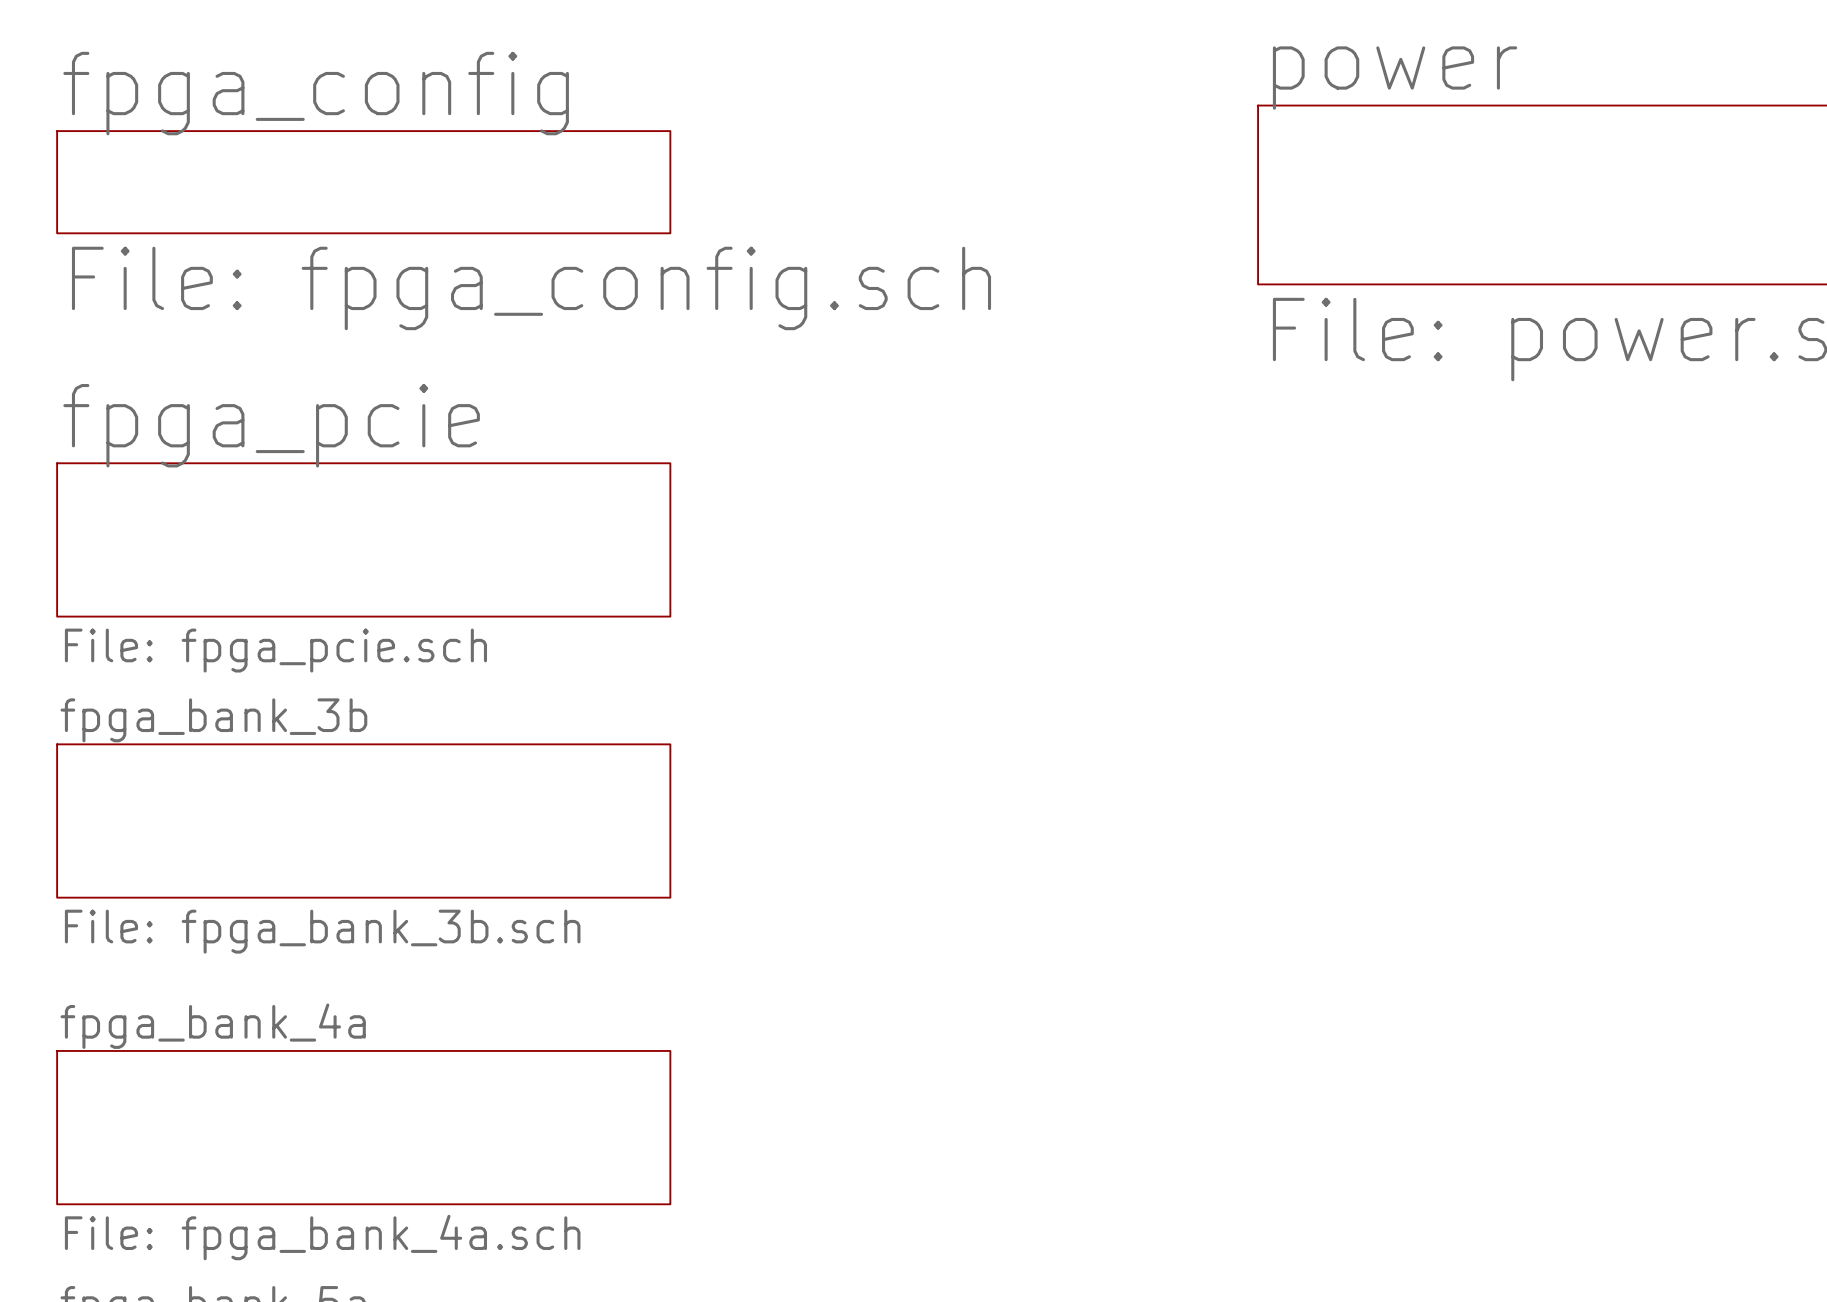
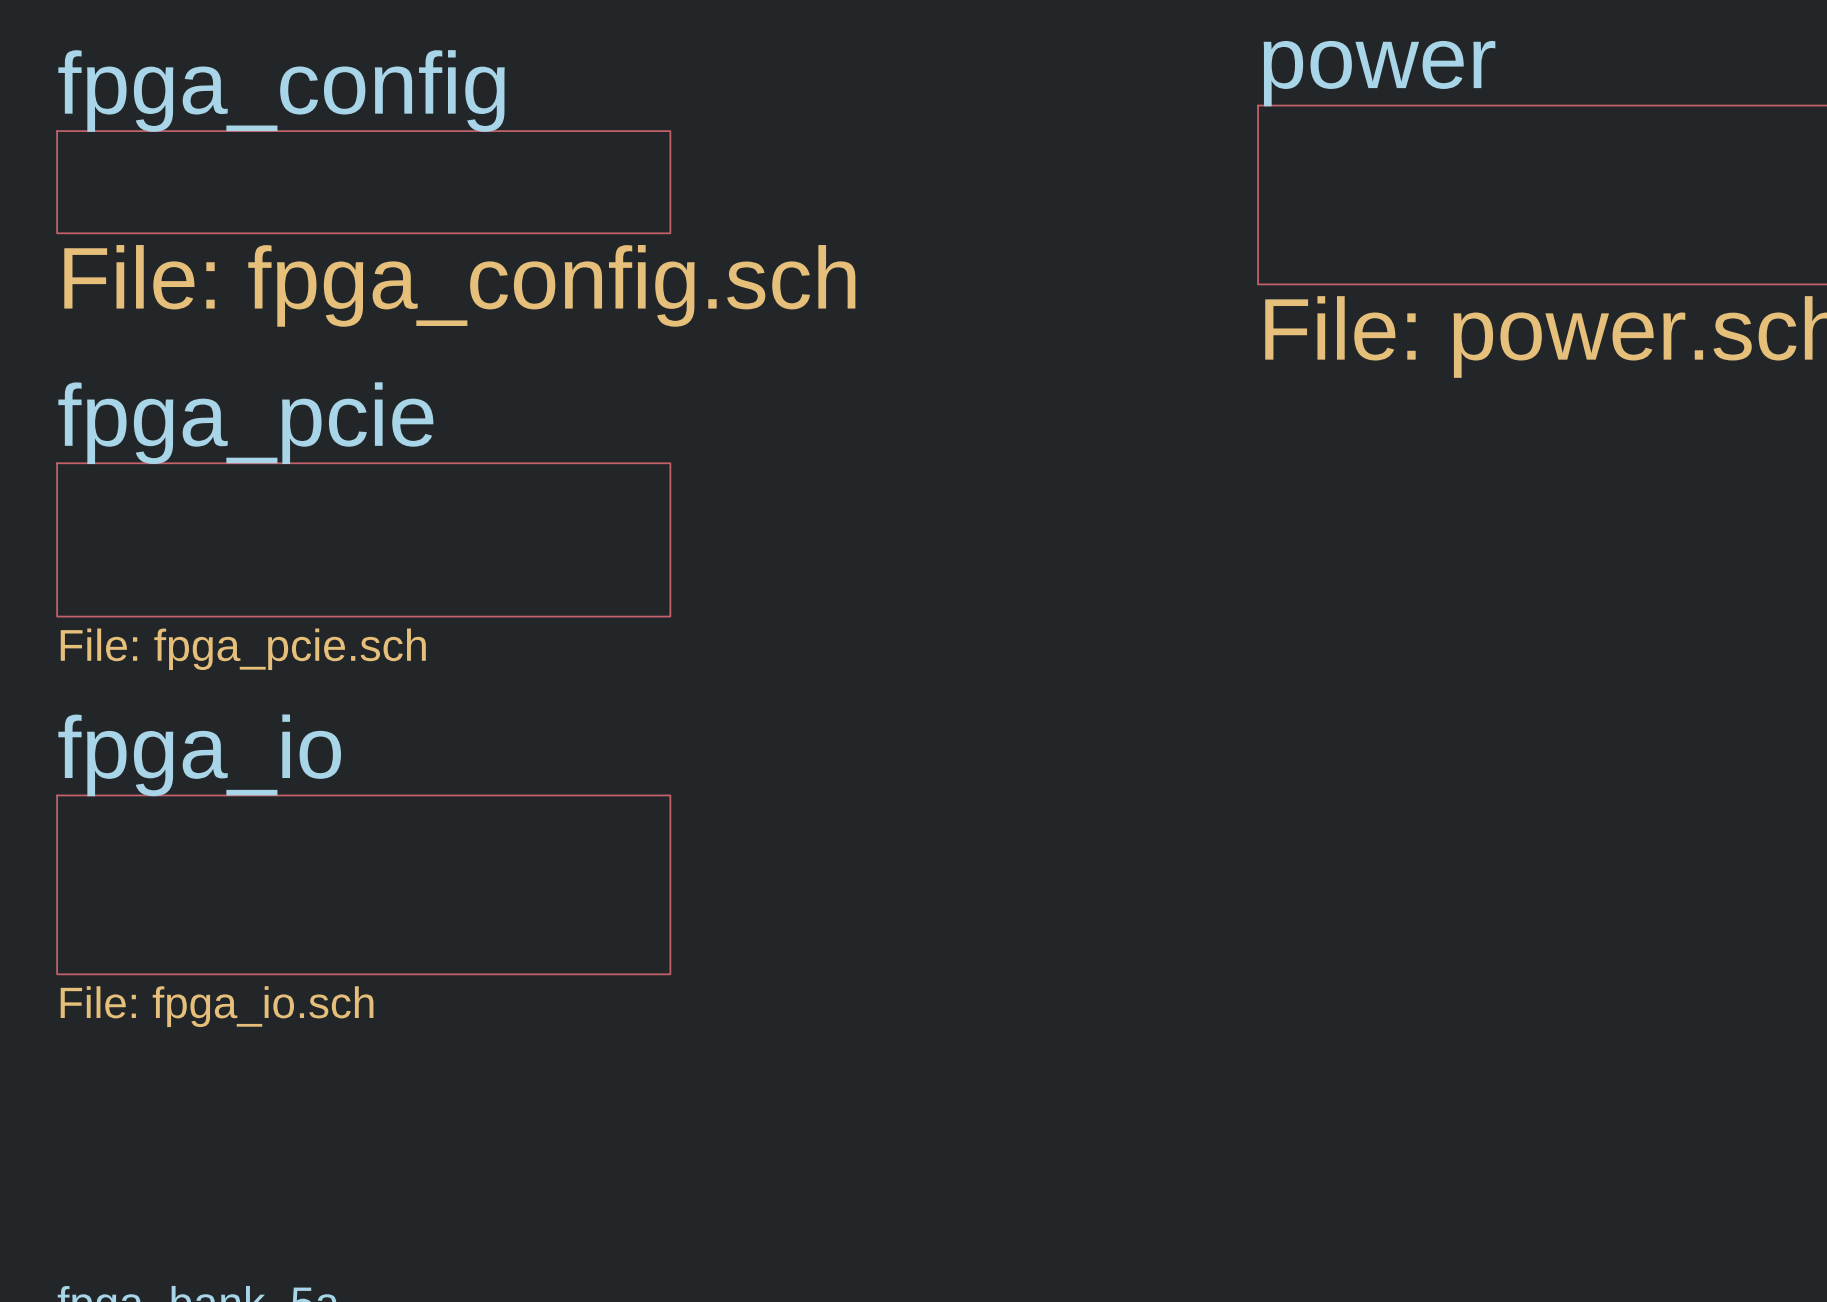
sheet fpga_bank_3b: File: fpga_bank_3b.sch (363, 821) -> none
sheet fpga_io: none -> File: fpga_io.sch (363, 884)
sheet fpga_bank_4a: File: fpga_bank_4a.sch (363, 1127) -> none

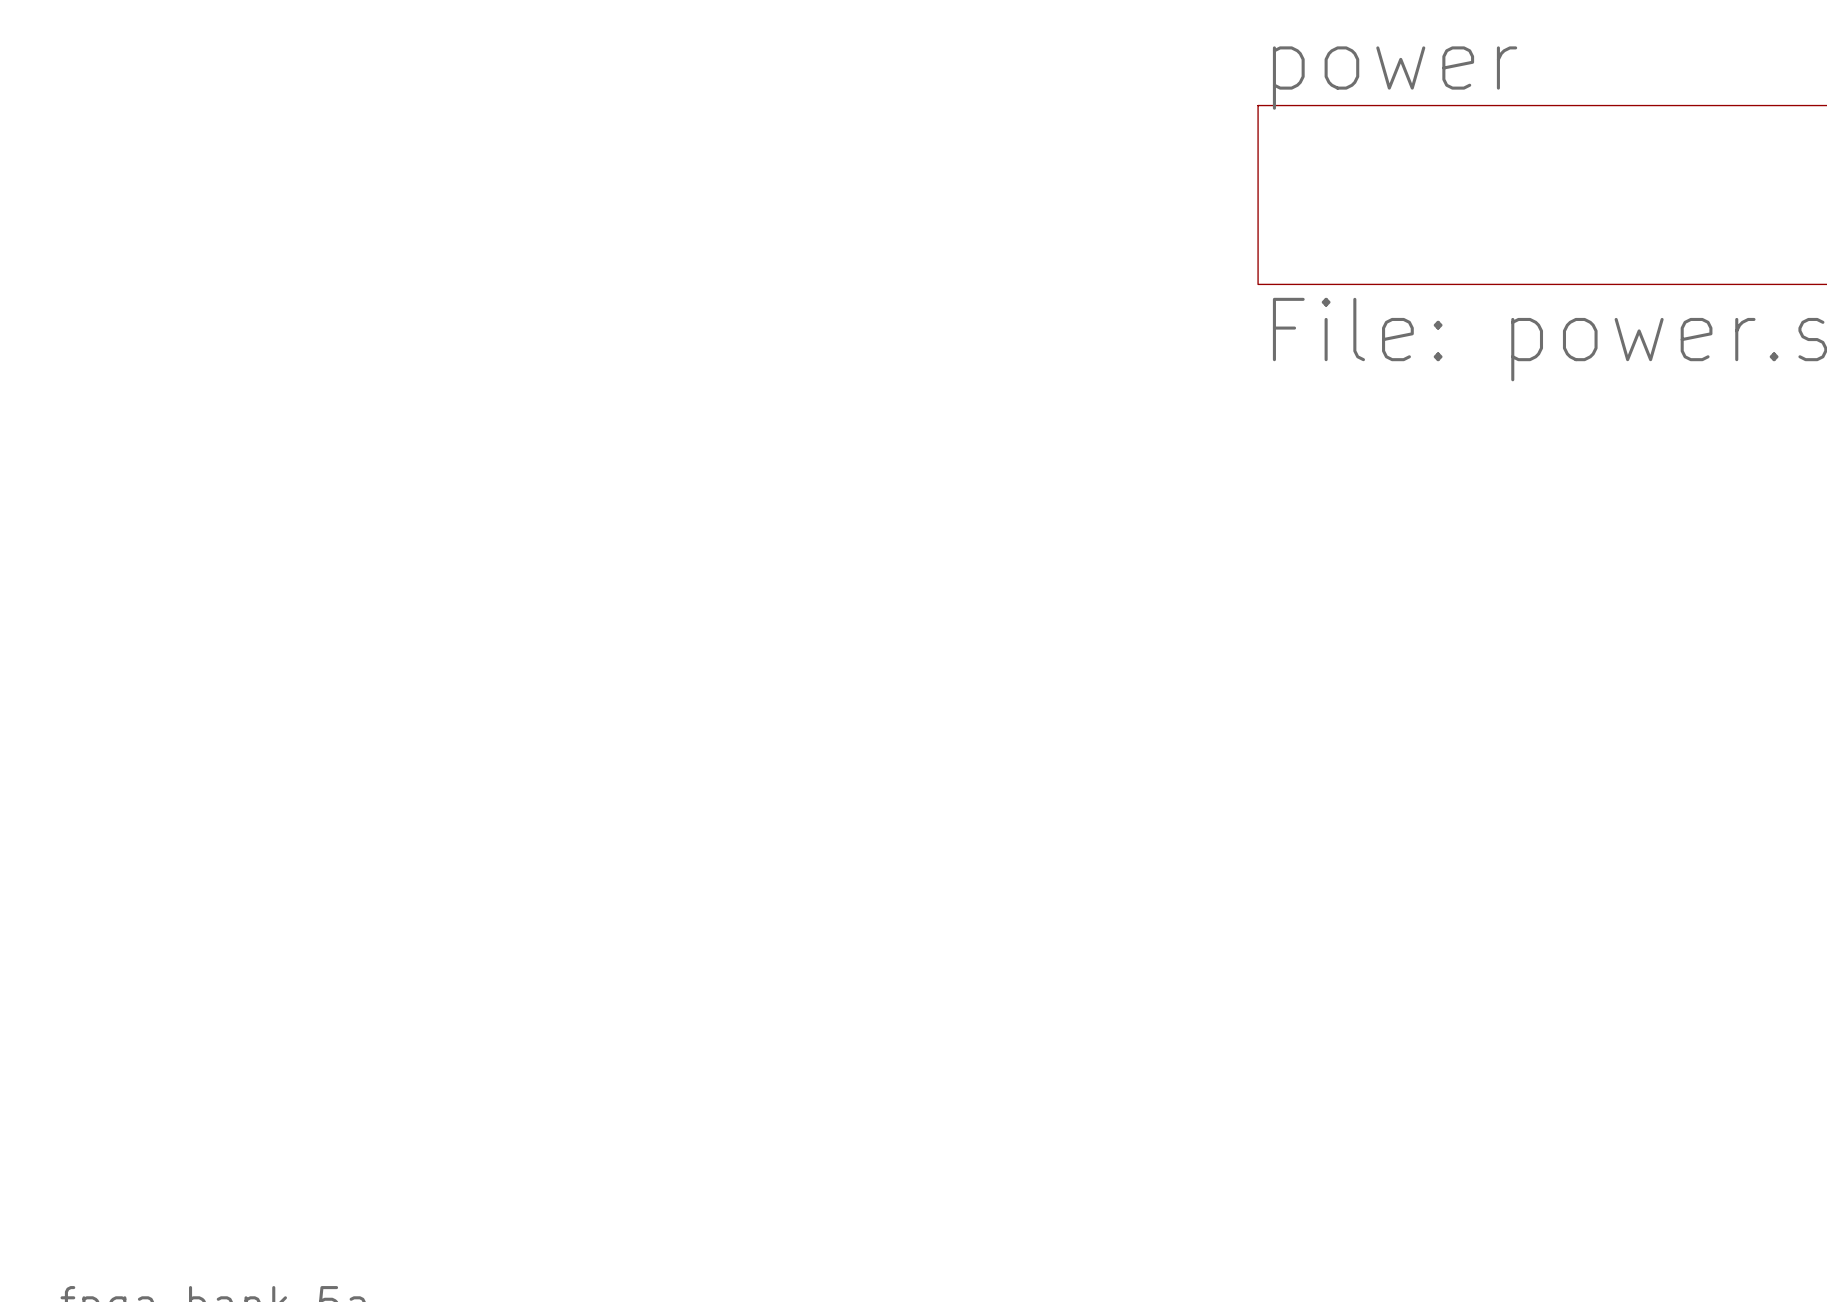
sheet fpga_config: File: fpga_config.sch (363, 182) -> none
sheet fpga_pcie: File: fpga_pcie.sch (363, 539) -> none
sheet fpga_io: File: fpga_io.sch (363, 884) -> none

